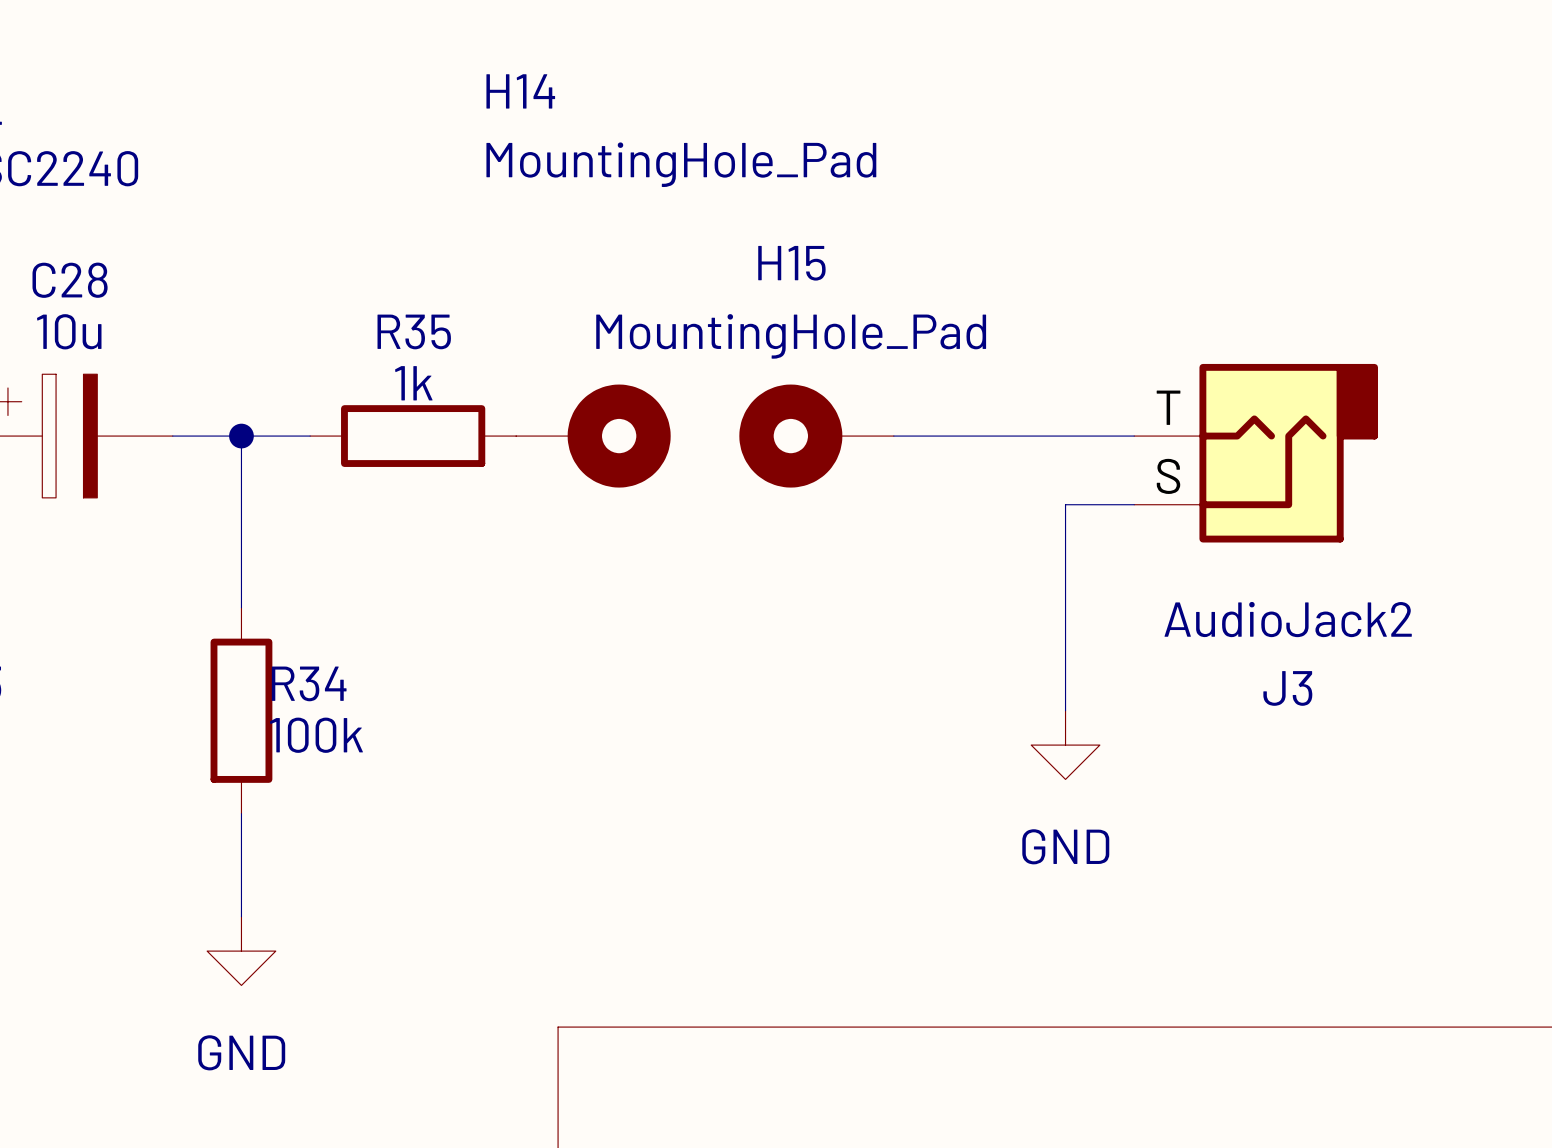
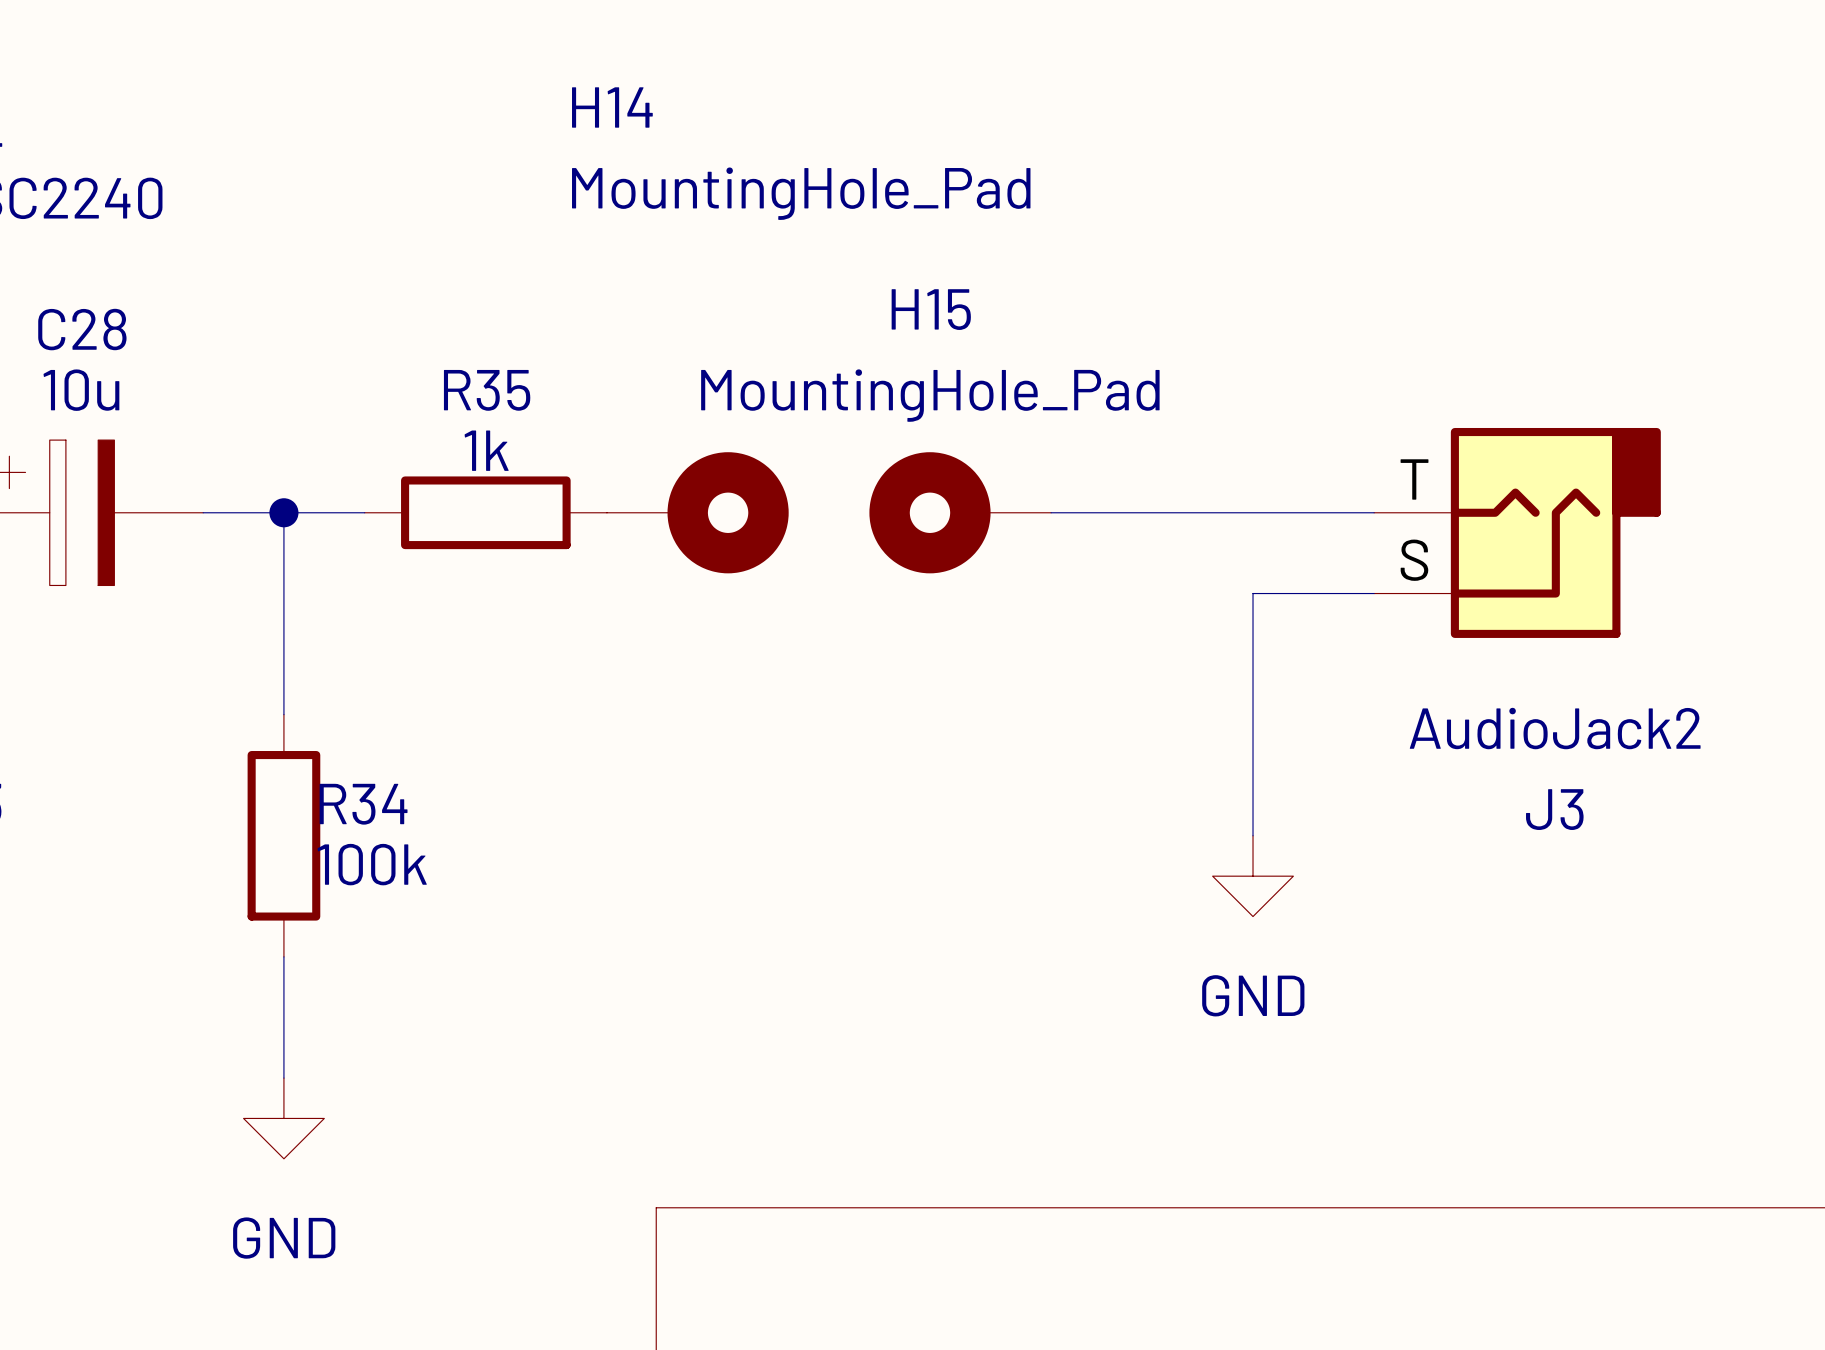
J3 position: (1256, 453) -> (1517, 532)

